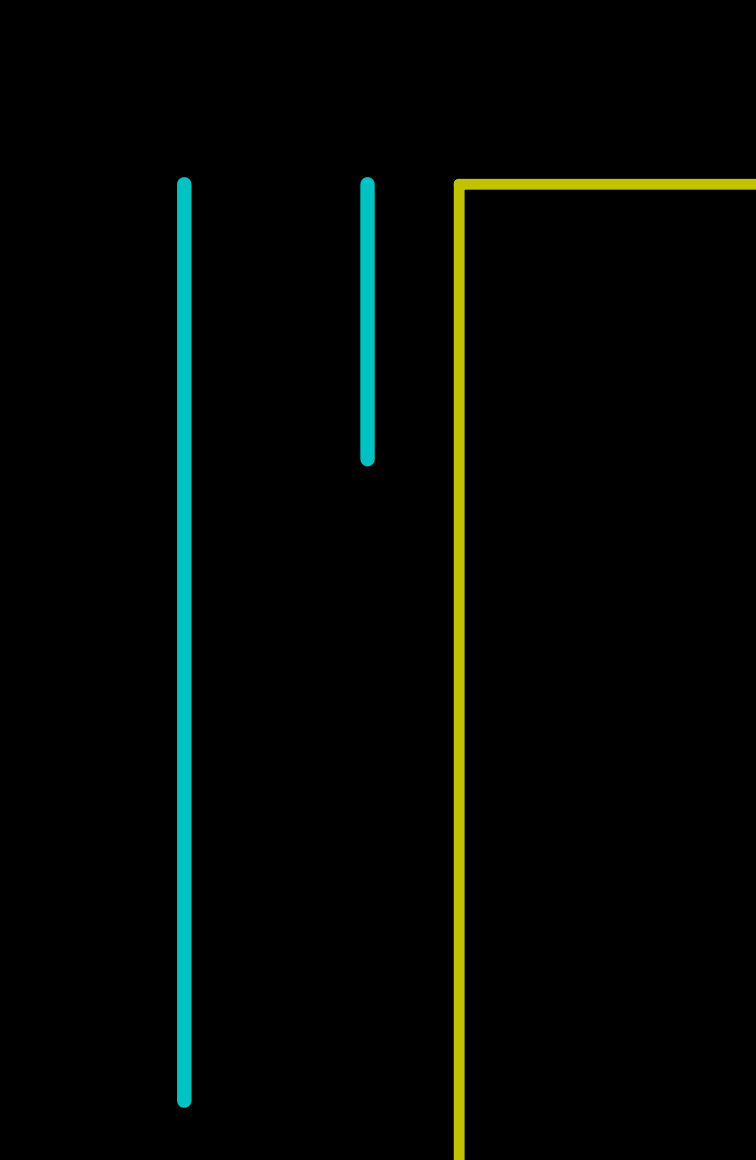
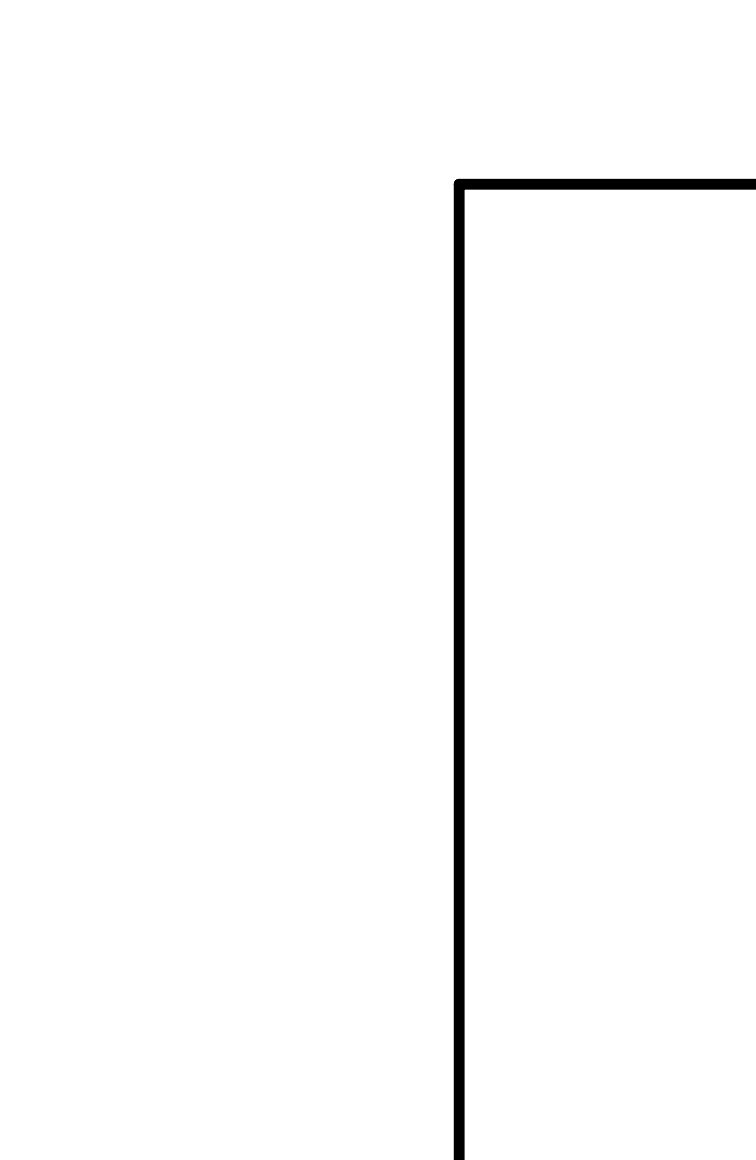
line: (184, 184) (184, 1100) -> none
line: (367, 184) (367, 459) -> none

